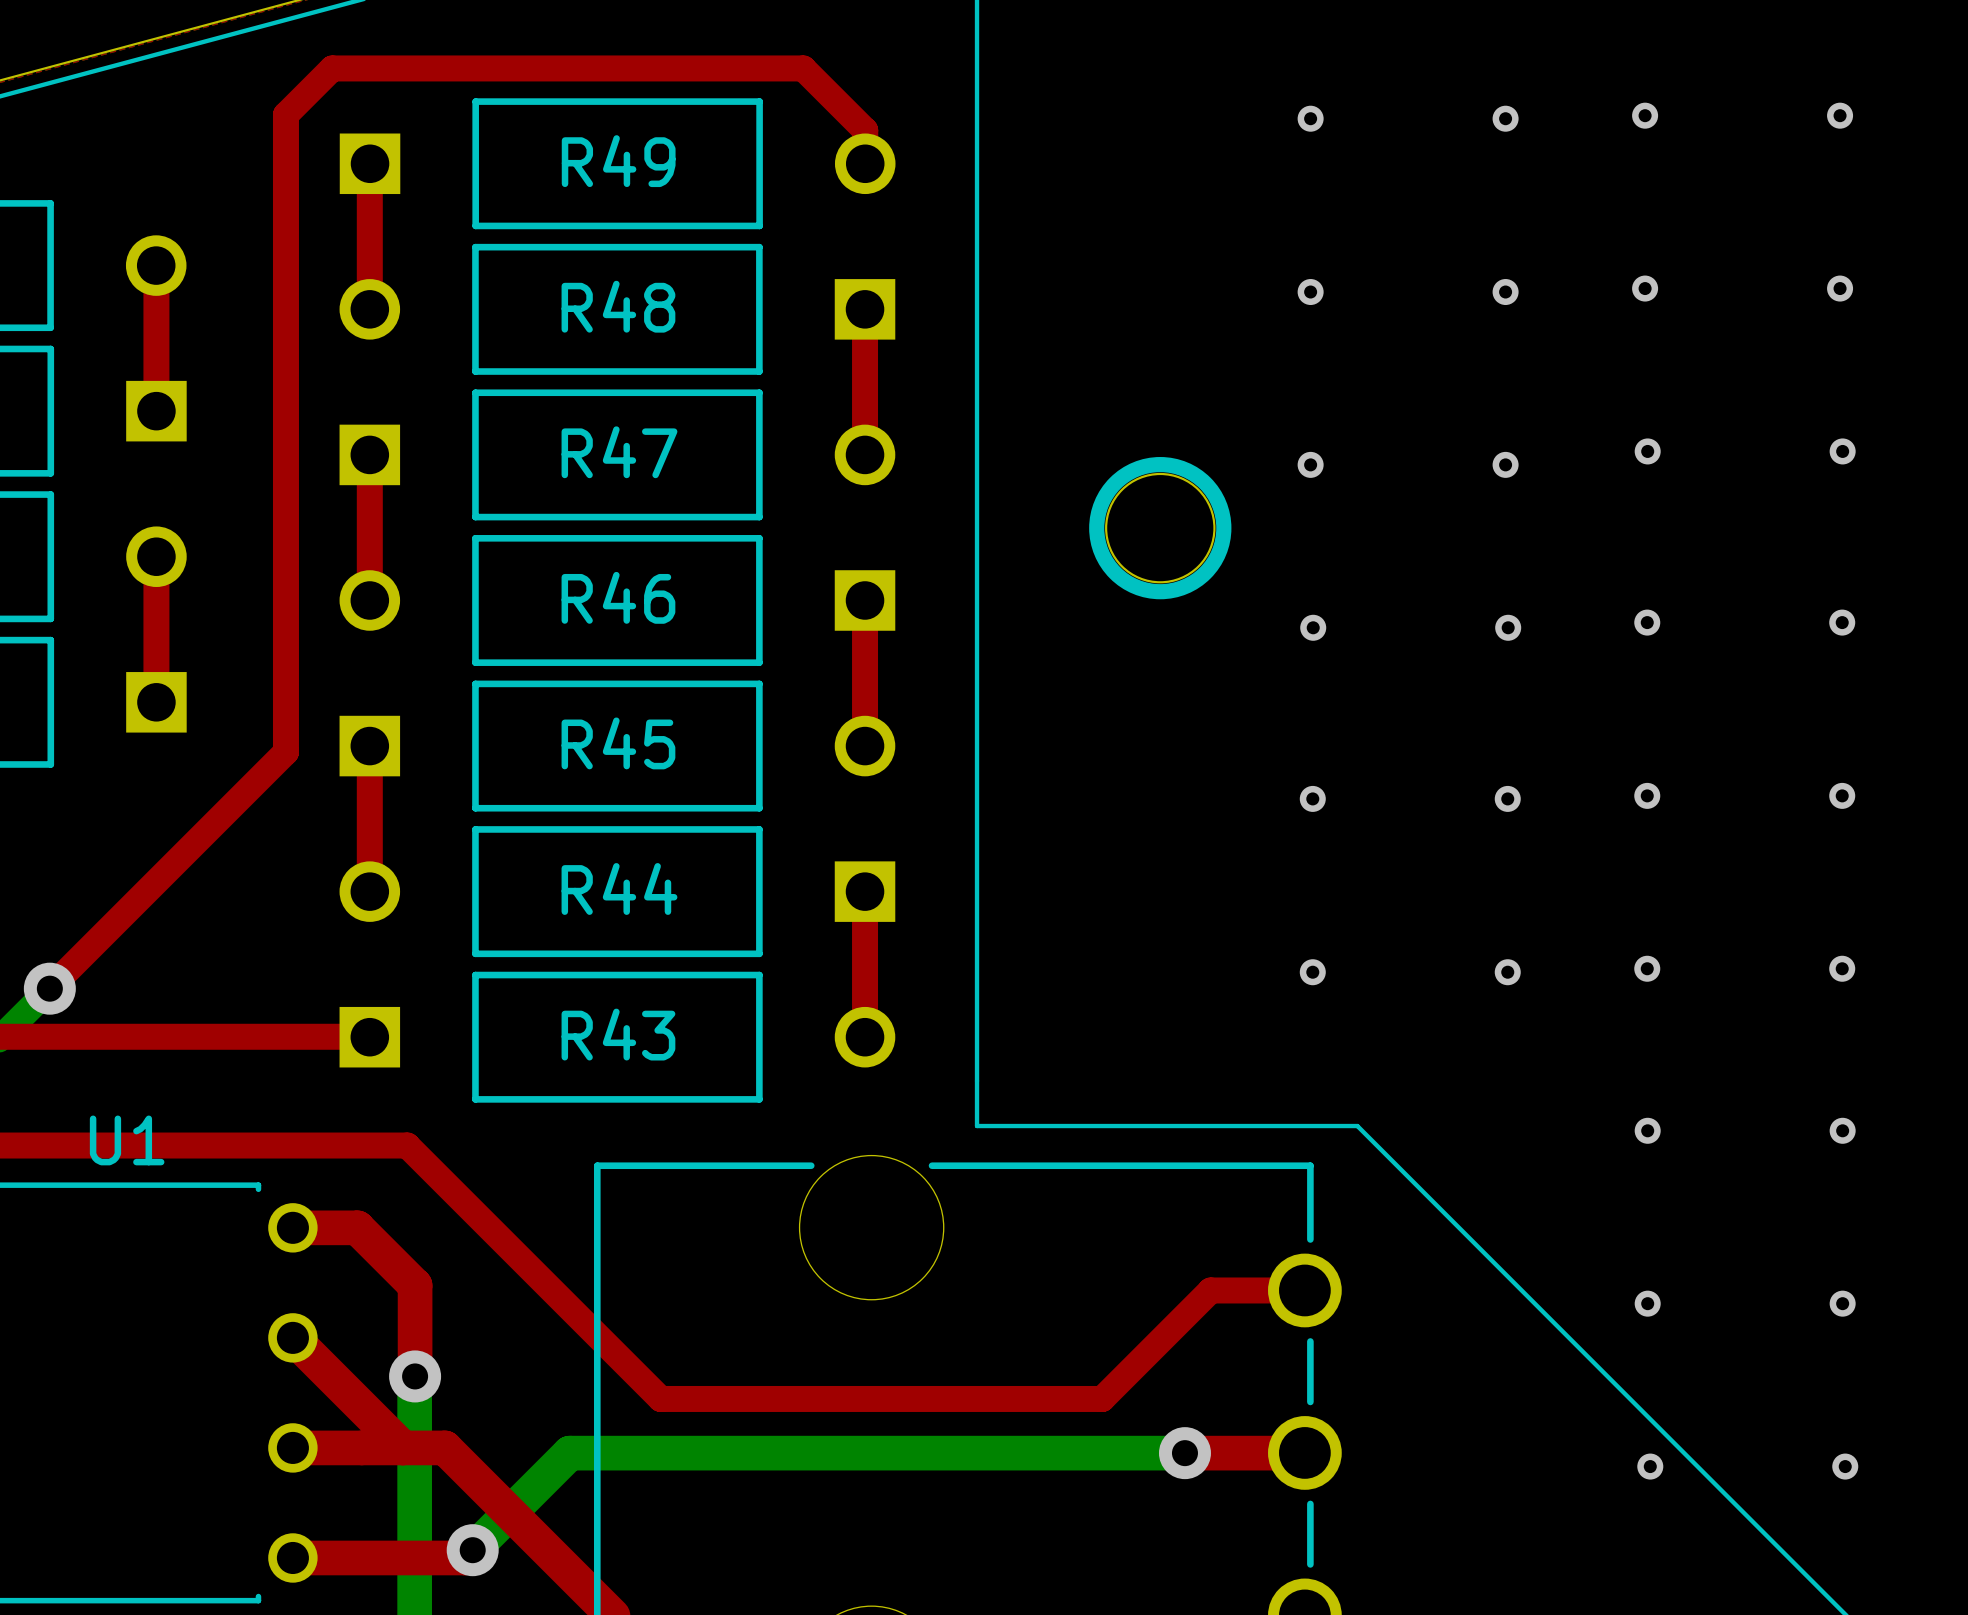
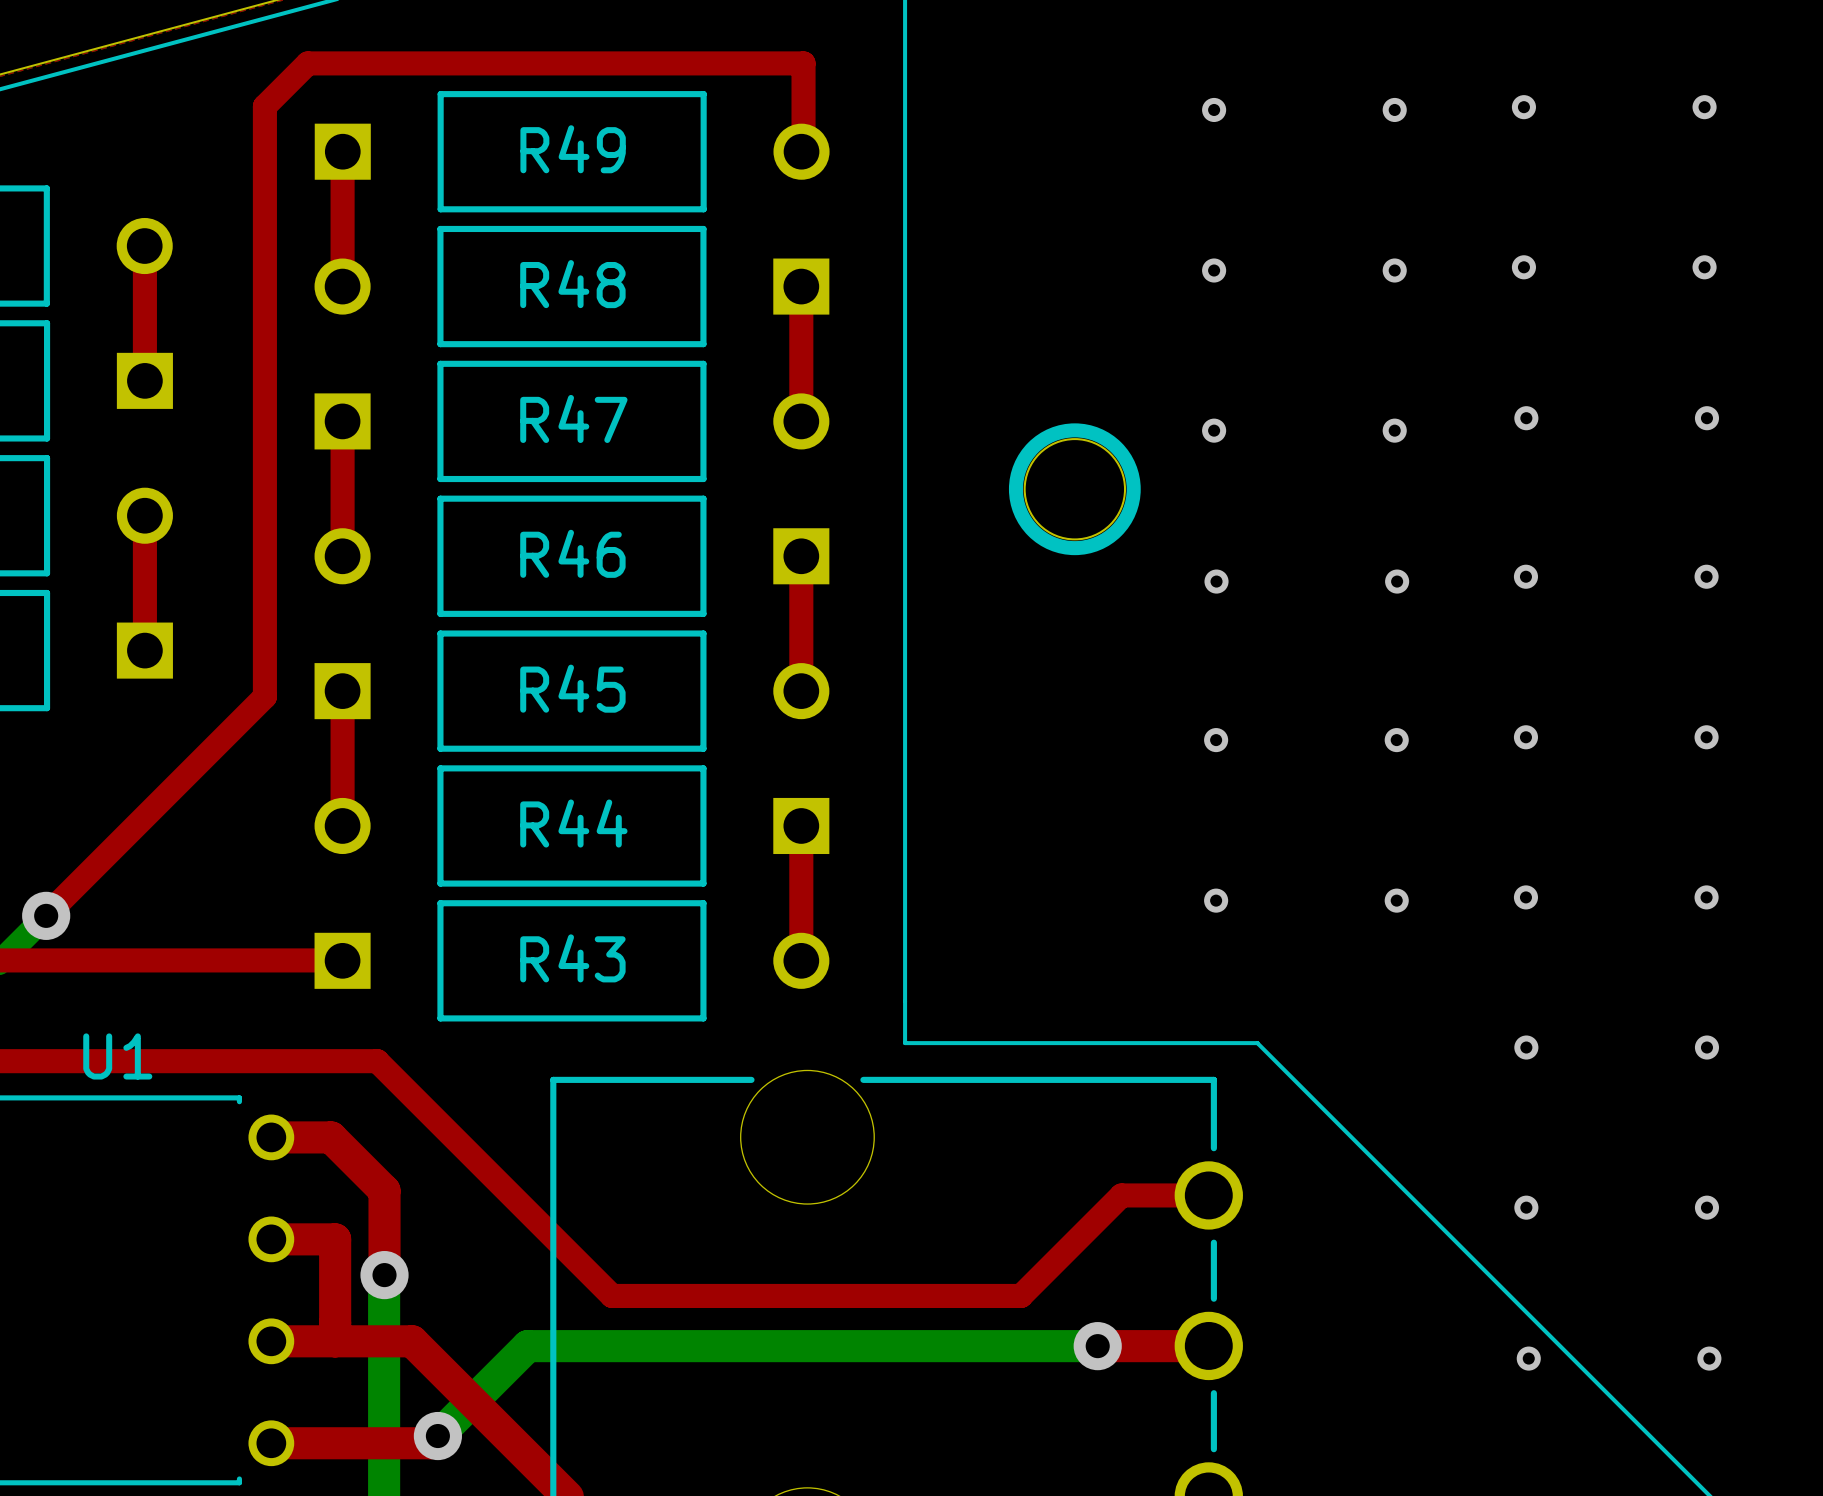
top track: (803, 68) (865, 130) (865, 163) -> (744, 63) (803, 63) (803, 149)
top track: (292, 1337) (402, 1447) -> (271, 1239) (335, 1239) (335, 1341)

